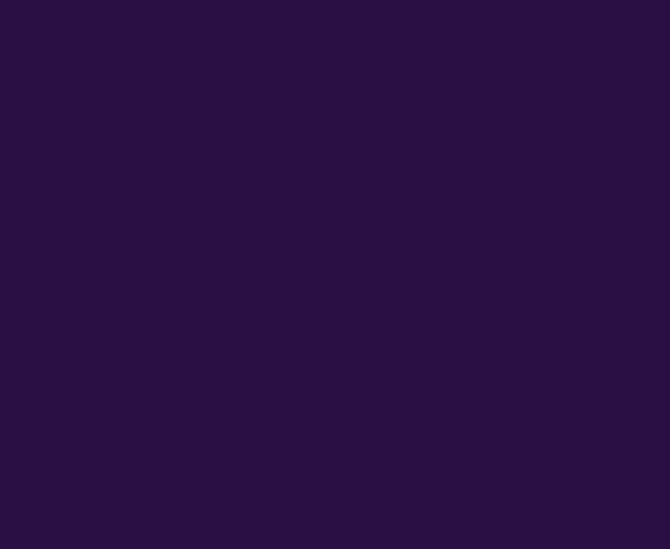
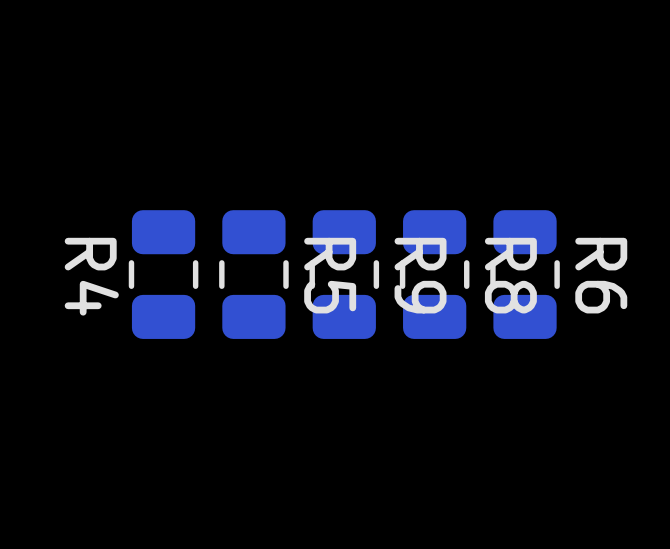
R4: none -> (163, 274)
R5: none -> (253, 274)
R9: none -> (344, 274)
R8: none -> (434, 274)
R6: none -> (525, 274)

